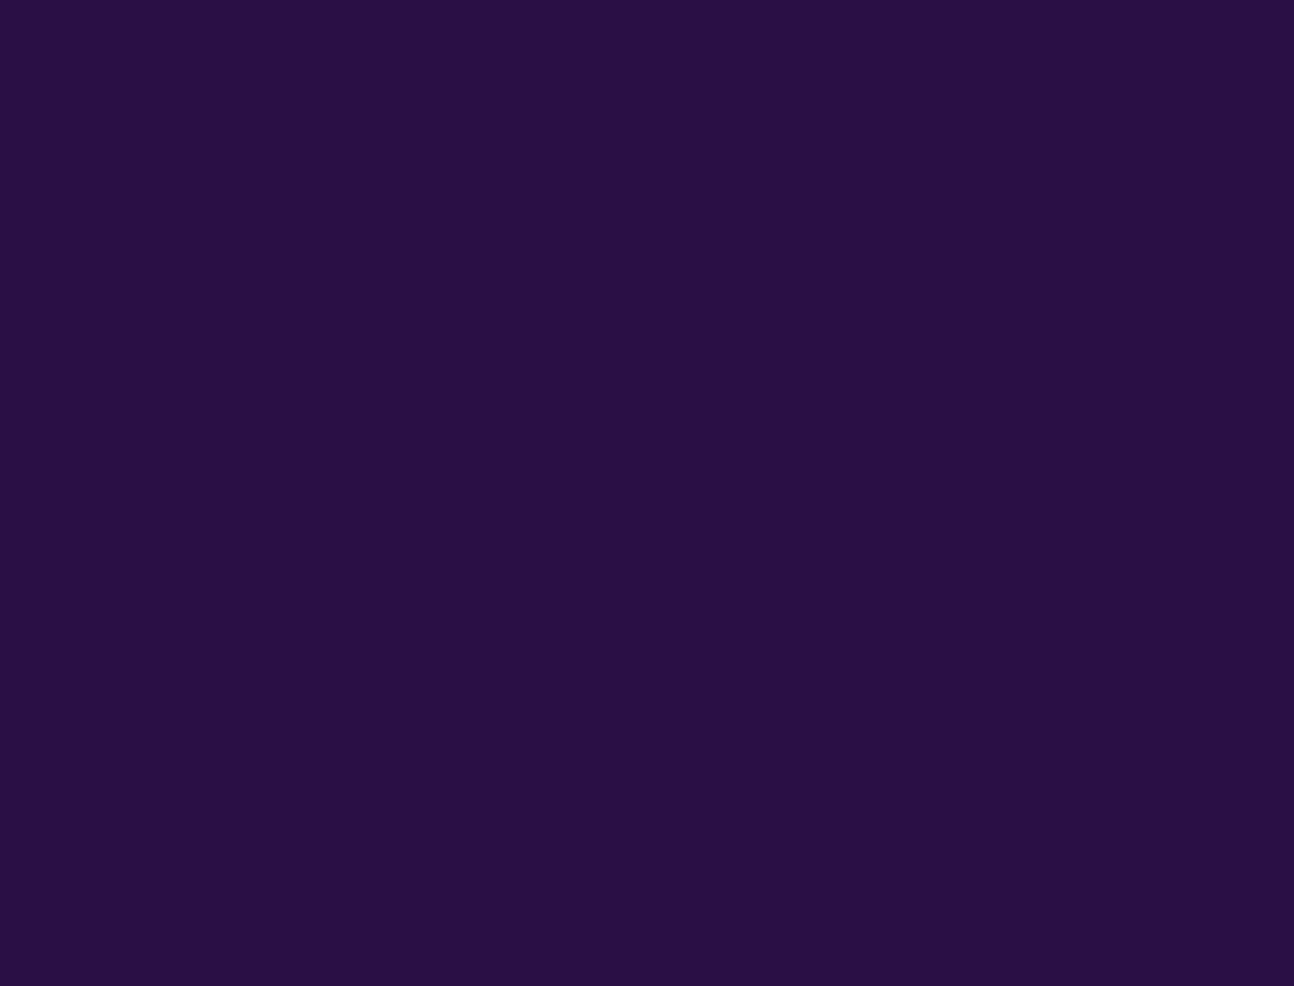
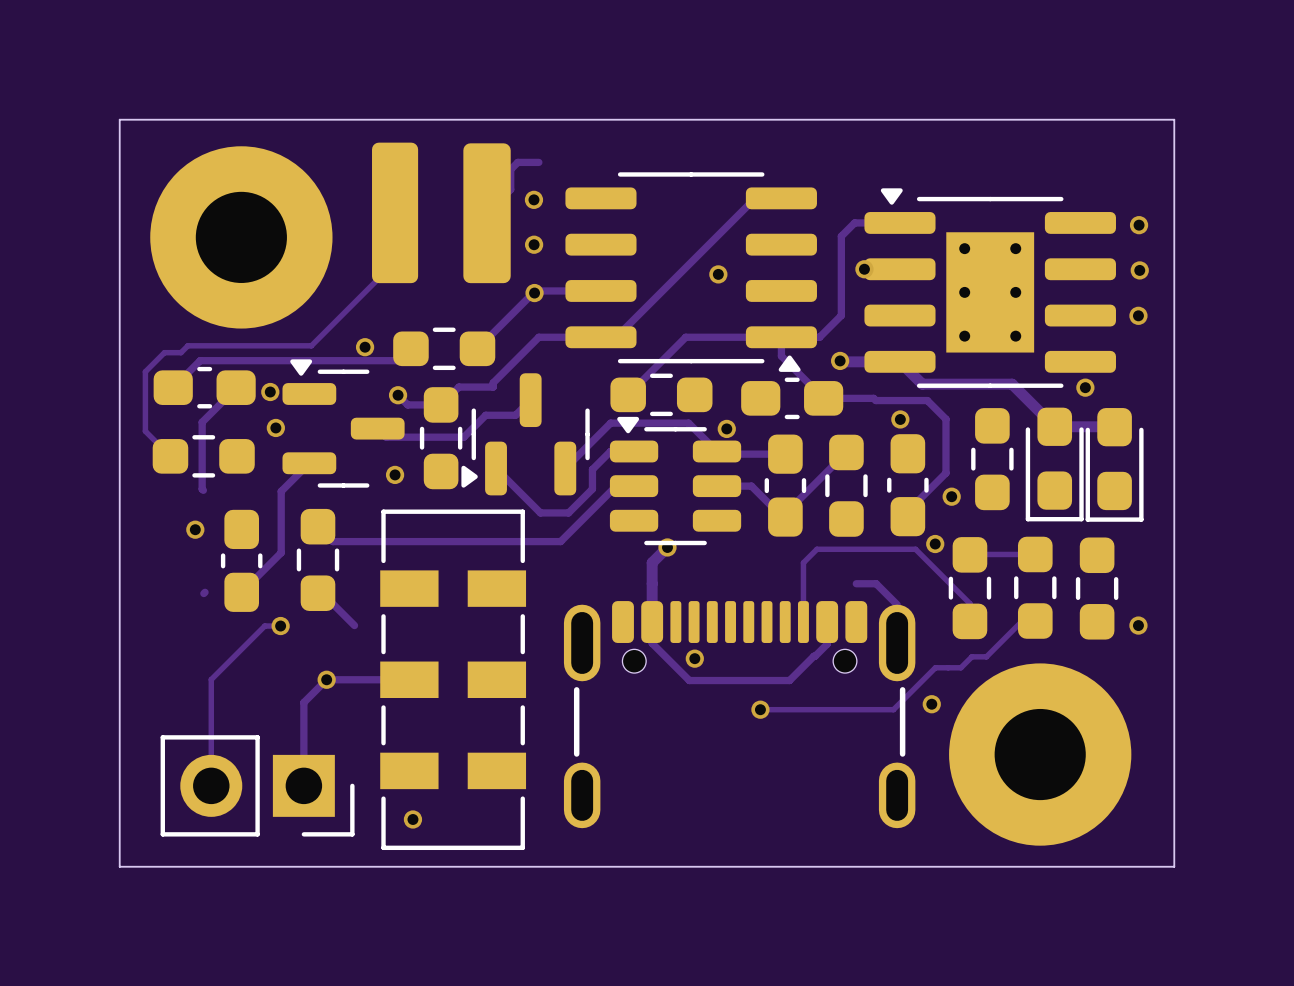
board edge: none -> (119, 119) (1174, 119) (1174, 866) (119, 866) (119, 119)
track: none -> (538, 162) (517, 162) (510, 169) (510, 189) (487, 213)
track: none -> (781, 198) (755, 198) (616, 337) (538, 337) (493, 382) (493, 387) (458, 387) (441, 404) (407, 404) (398, 395)
via: none -> (533, 199)
track: none -> (395, 212) (395, 262) (311, 345) (187, 345) (181, 352) (164, 352) (145, 371) (145, 431) (170, 456)
part: none -> (441, 212)
track: none -> (899, 222) (854, 222) (841, 236) (841, 315) (819, 337) (685, 337) (628, 394)
via: none -> (1139, 225)
part: none -> (241, 237)
via: none -> (534, 244)
via: none -> (864, 269)
via: none -> (1139, 270)
part: none -> (691, 272)
via: none -> (718, 274)
part: none -> (990, 288)
track: none -> (600, 290) (535, 290) (477, 348)
via: none -> (534, 293)
via: none -> (1138, 315)
track: none -> (781, 337) (781, 356) (823, 398) (927, 400) (945, 419) (945, 473) (907, 511) (907, 530)
via: none -> (365, 347)
track: none -> (410, 348) (399, 360) (200, 360) (173, 387)
part: none -> (444, 348)
track: none -> (840, 360) (899, 361) (922, 384) (1012, 384) (1054, 426) (1114, 426)
via: none -> (840, 360)
part: none -> (204, 387)
via: none -> (1085, 387)
track: none -> (236, 388) (202, 422) (203, 490)
via: none -> (270, 392)
part: none -> (661, 394)
via: none -> (398, 395)
part: none -> (792, 398)
track: none -> (530, 400) (515, 415) (485, 415) (463, 437) (386, 437) (377, 428)
via: none -> (900, 419)
part: none -> (343, 423)
via: none -> (275, 427)
via: none -> (726, 428)
part: none -> (525, 434)
part: none -> (441, 438)
track: none -> (634, 451) (610, 451) (592, 469) (592, 489) (568, 512) (540, 512) (496, 468)
track: none -> (846, 452) (785, 513) (785, 517) (782, 517) (751, 486) (717, 486)
track: none -> (785, 454) (719, 454) (688, 423) (610, 423) (565, 468)
part: none -> (203, 456)
part: none -> (992, 459)
track: none -> (309, 463) (281, 491) (281, 552) (241, 592)
part: none -> (1054, 464)
part: none -> (1114, 464)
via: none -> (395, 474)
part: none -> (675, 481)
part: none -> (785, 485)
part: none -> (846, 485)
part: none -> (907, 485)
track: none -> (634, 486) (616, 486) (560, 541) (332, 541) (317, 526)
via: none -> (951, 496)
via: none -> (195, 529)
via: none -> (935, 544)
track: none -> (667, 547) (652, 562) (652, 601)
via: none -> (667, 547)
track: none -> (970, 554) (1035, 554)
part: none -> (317, 559)
part: none -> (241, 560)
track: none -> (856, 583) (876, 583) (897, 604)
part: none -> (1035, 587)
part: none -> (969, 588)
part: none -> (1097, 588)
track: none -> (205, 592) (203, 593)
track: none -> (317, 593) (322, 593) (354, 625)
track: none -> (969, 621) (969, 603) (915, 549) (816, 549) (803, 562) (803, 622)
track: none -> (1022, 621) (986, 656) (971, 656) (960, 667) (935, 667) (893, 709) (760, 709)
track: none -> (652, 622) (652, 643) (689, 680) (789, 680) (827, 644) (827, 622)
via: none -> (1138, 625)
track: none -> (280, 626) (264, 626) (211, 679) (211, 785)
via: none -> (280, 626)
via: none -> (694, 658)
via: none -> (326, 679)
track: none -> (409, 679) (326, 679) (303, 702) (303, 785)
part: none -> (453, 679)
via: none -> (931, 704)
via: none -> (760, 709)
part: none -> (739, 714)
part: none -> (1040, 754)
part: none -> (257, 785)
via: none -> (412, 819)

